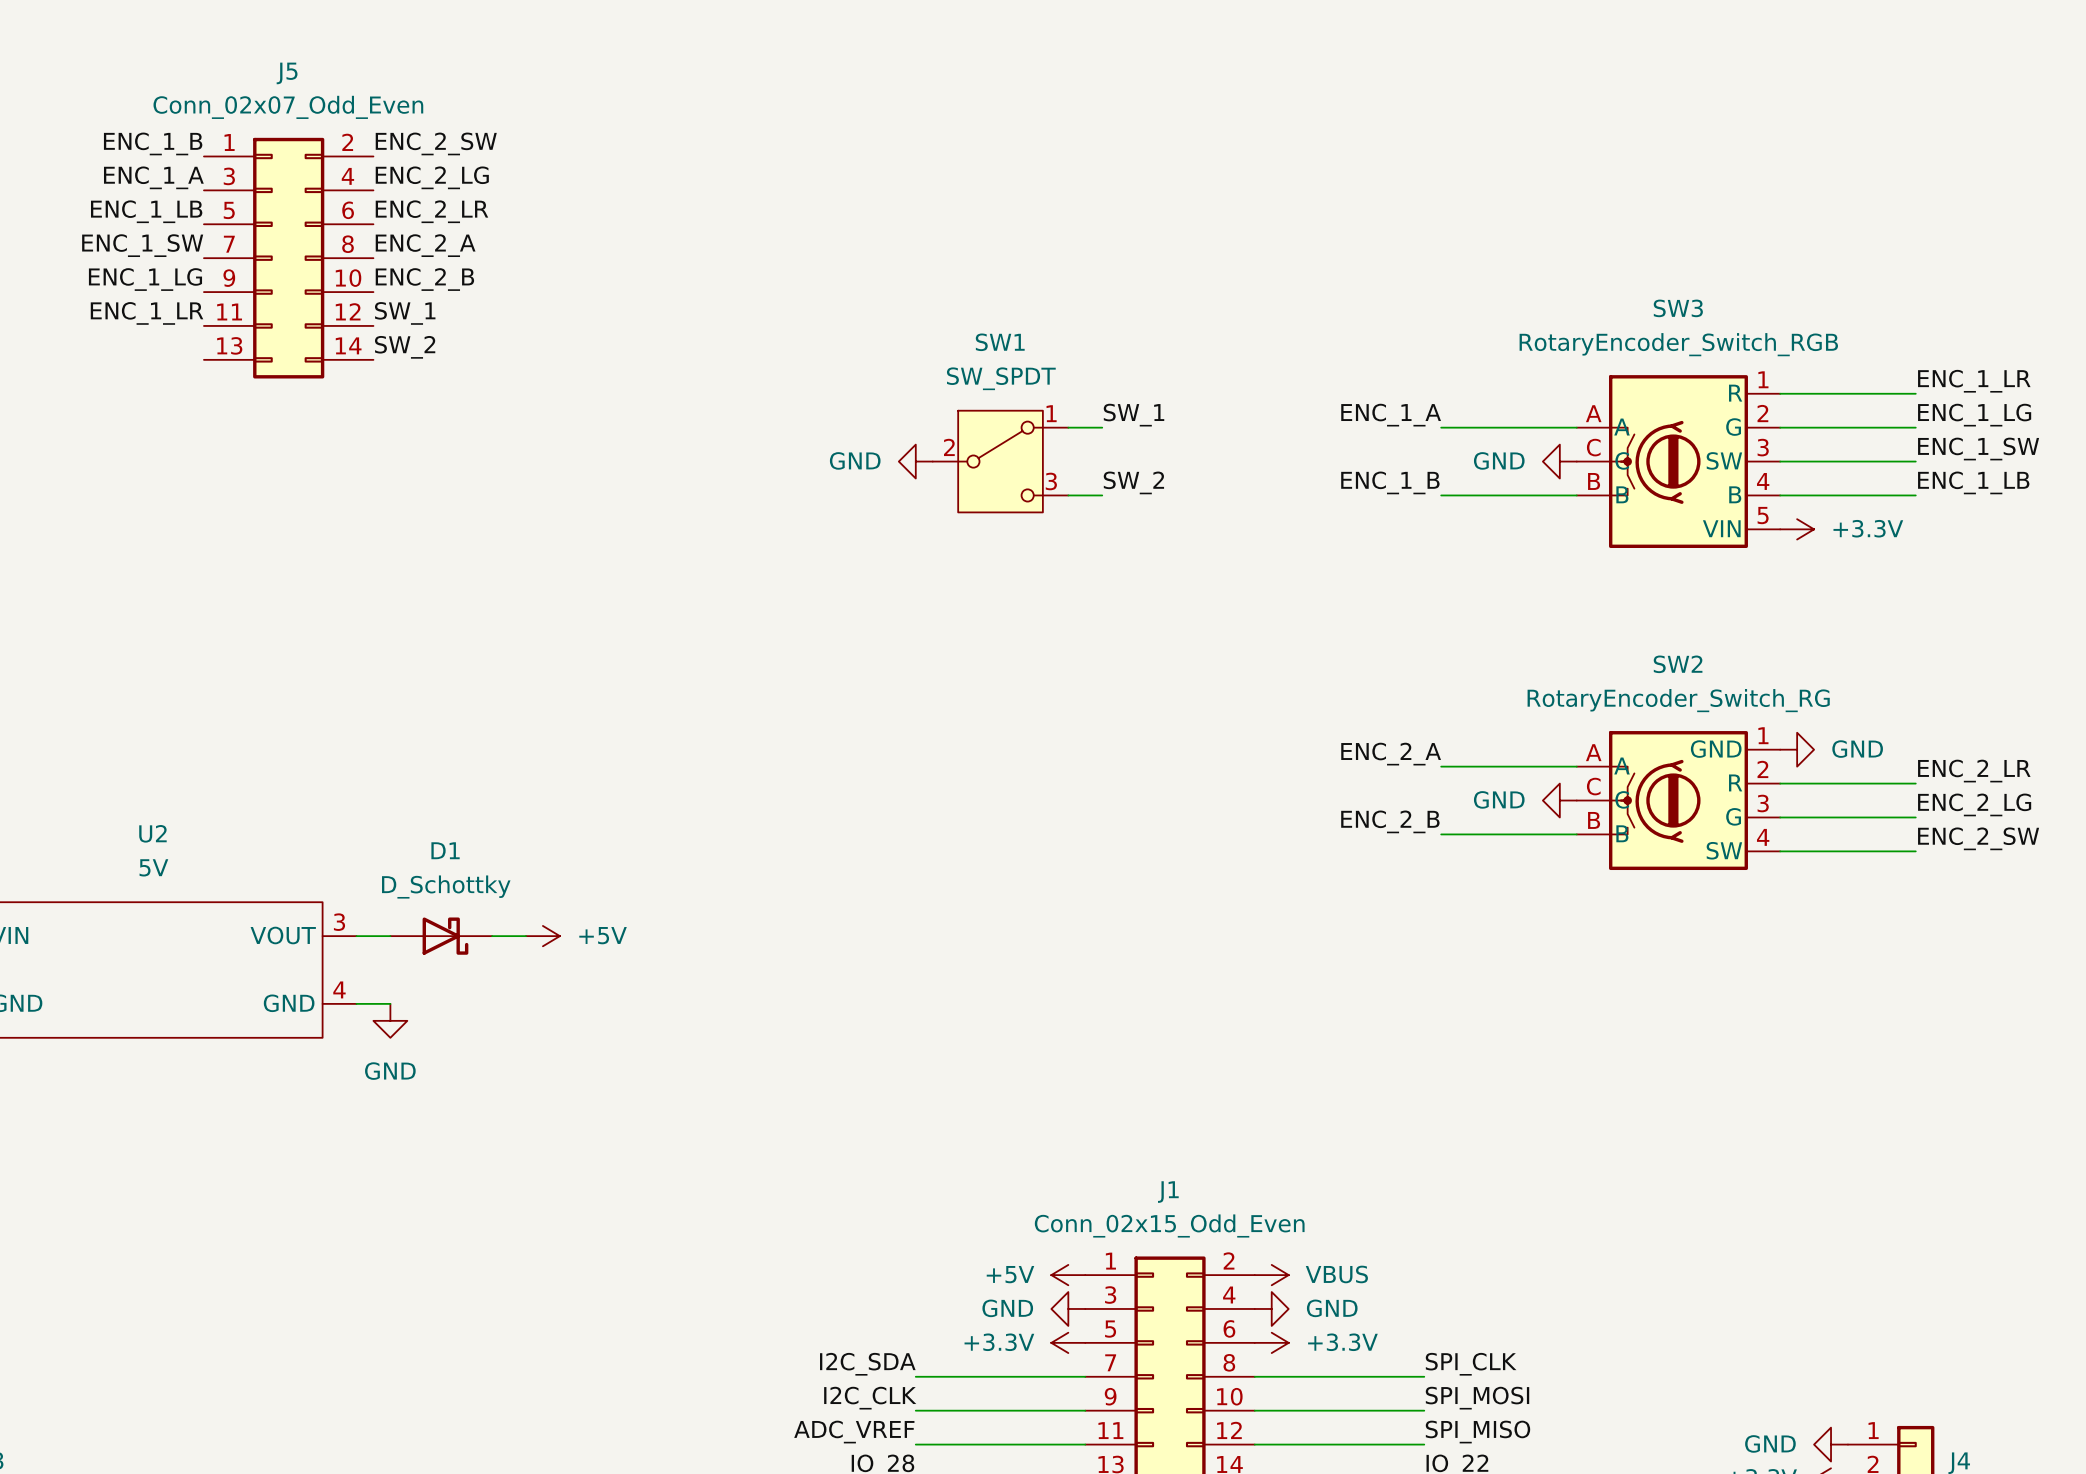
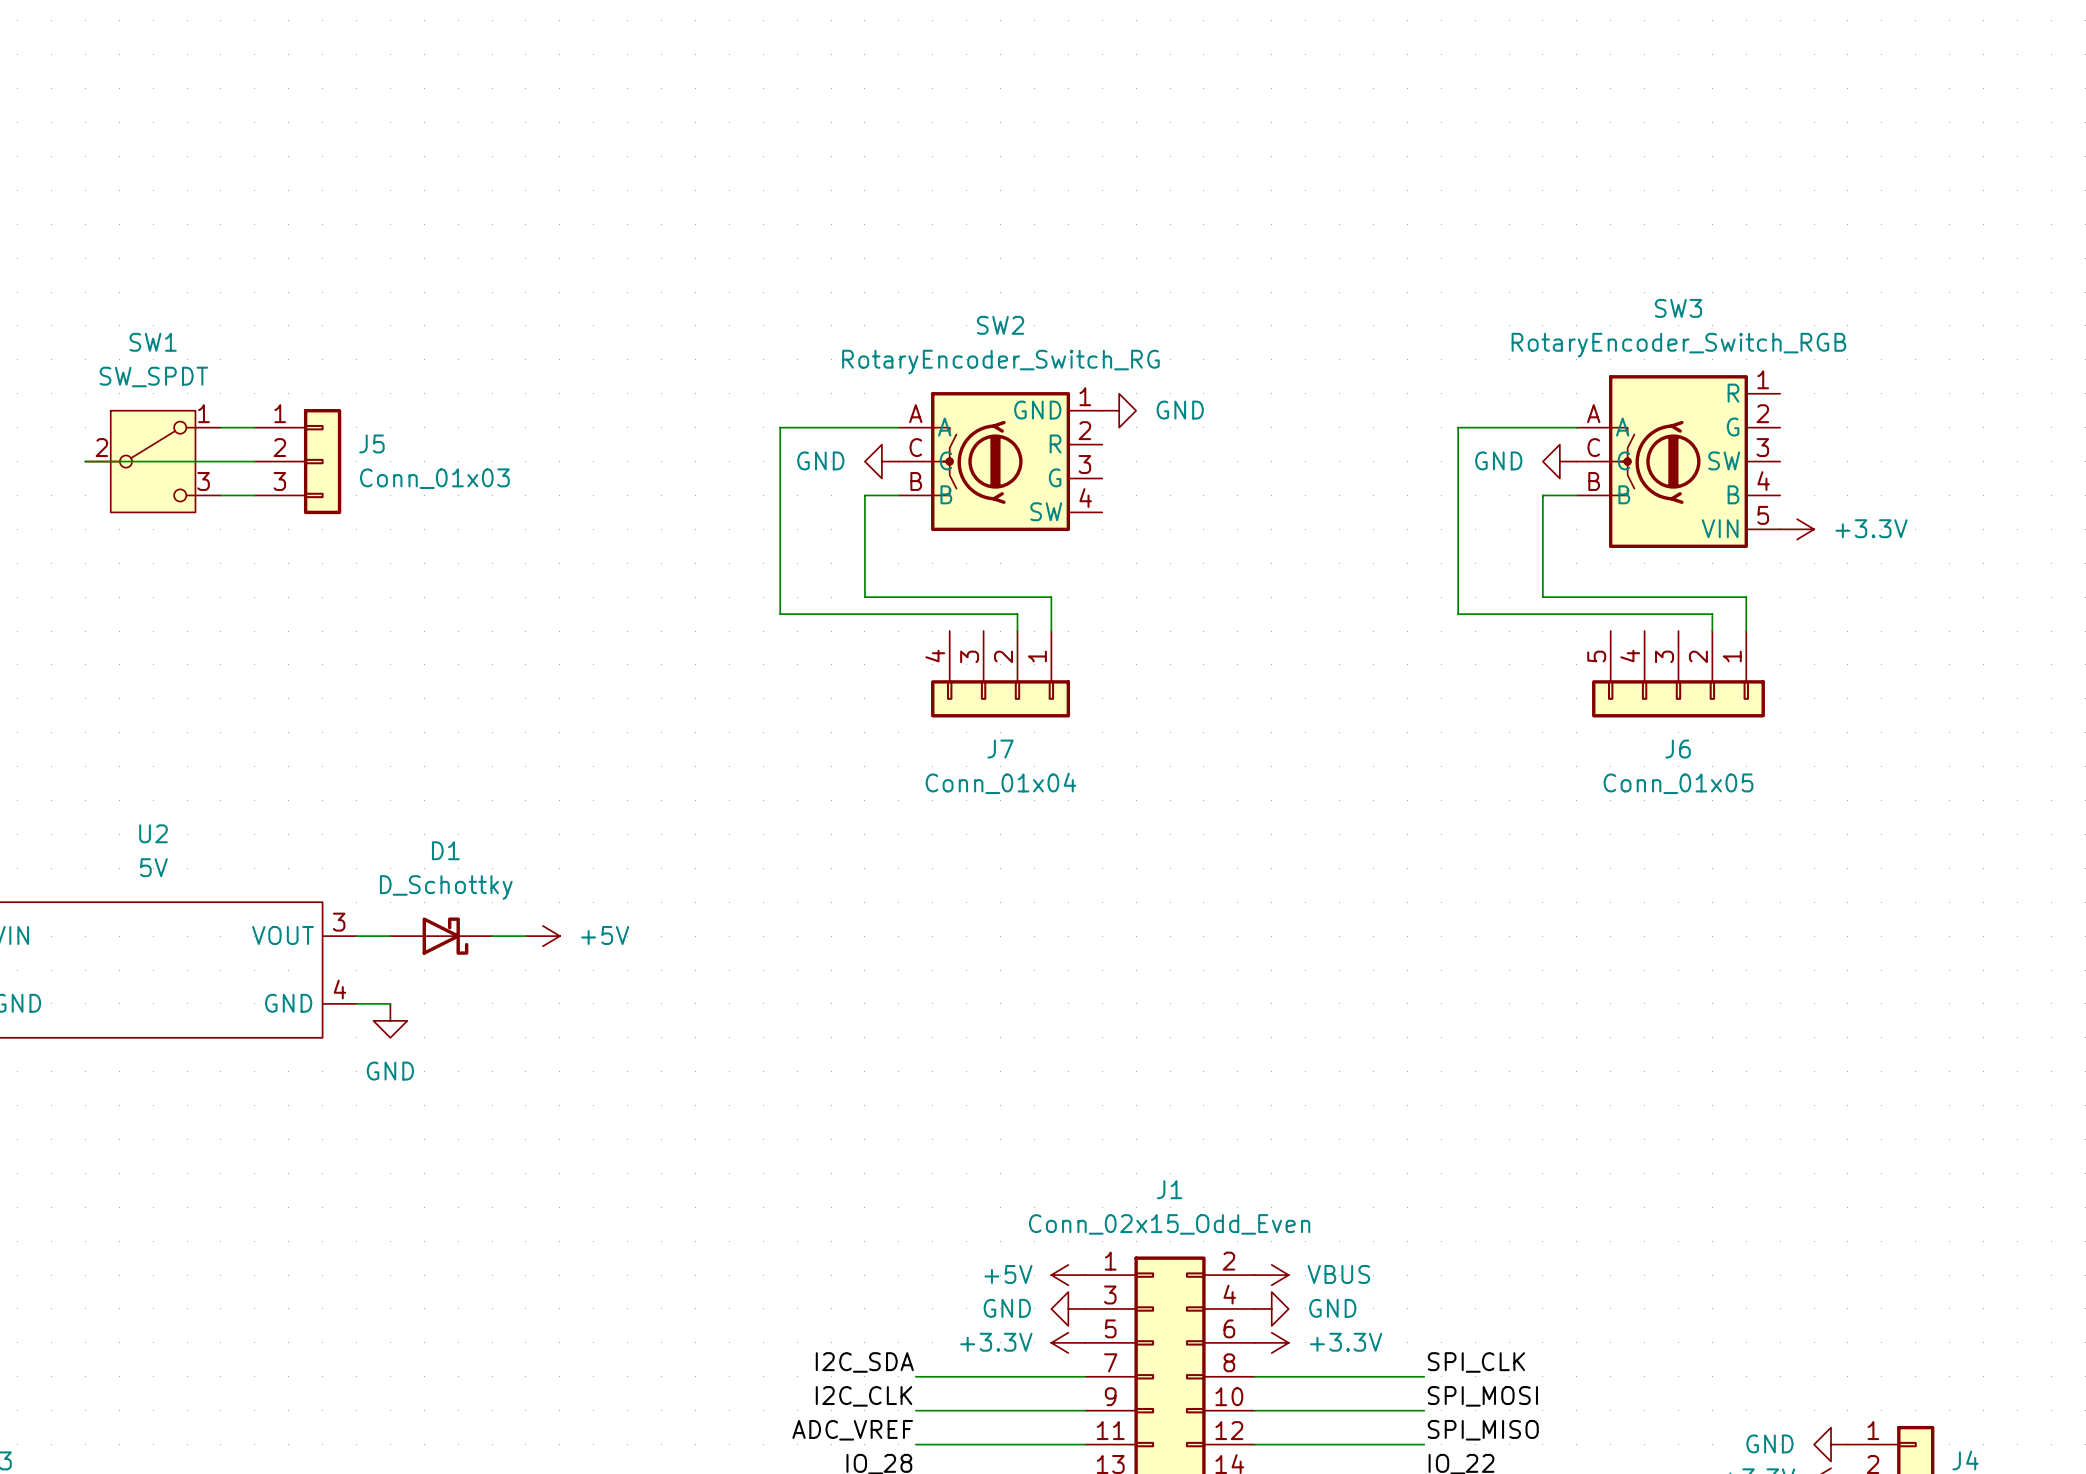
J5 name position: J5 (287, 73) -> J5 (371, 443)
J5 value: Conn_02x07_Odd_Even (288, 107) -> Conn_01x03 (434, 478)
J5 symbol: [203, 137, 374, 379] -> [254, 409, 342, 515]
label: ENC_1_B (153, 143) -> none
label: ENC_2_SW (436, 143) -> none
label: ENC_1_A (153, 177) -> none
label: ENC_2_LG (432, 177) -> none
label: ENC_1_LB (146, 211) -> none
label: ENC_2_LR (431, 211) -> none
label: ENC_1_SW (142, 245) -> none
label: ENC_2_A (425, 245) -> none
label: ENC_1_LG (145, 279) -> none
label: ENC_2_B (424, 279) -> none
label: ENC_1_LR (147, 313) -> none
label: SW_1 (405, 313) -> none
label: SW_2 (405, 347) -> none
label: ENC_1_LR (1974, 381) -> none
wire: (1780, 393) (1915, 393) -> none
power symbol: none -> GND (1119, 410)
label: SW_1 (1134, 415) -> none
label: ENC_1_A (1391, 415) -> none
label: ENC_1_LG (1974, 415) -> none
wire: none -> (220, 427) (254, 427)
wire: none -> (898, 427) (780, 427) (780, 614) (1017, 614) (1017, 631)
wire: (1068, 427) (1102, 427) -> none
wire: (1441, 427) (1458, 427) -> (1712, 631) (1712, 614) (1458, 614) (1458, 427)
wire: (1780, 427) (1915, 427) -> none
label: ENC_1_SW (1978, 449) -> none
wire: none -> (85, 461) (254, 461)
power symbol position: GND (915, 461) -> GND (881, 461)
SW1 position: (1000, 461) -> (153, 461)
wire: (1780, 461) (1915, 461) -> none
label: SW_2 (1133, 482) -> none
label: ENC_1_B (1390, 482) -> none
label: ENC_1_LB (1973, 482) -> none
wire: none -> (220, 495) (254, 495)
wire: none -> (898, 495) (864, 495) (864, 597) (1051, 597) (1051, 631)
wire: (1068, 495) (1102, 495) -> none
wire: (1441, 495) (1542, 495) -> (1746, 631) (1746, 597) (1542, 597) (1542, 495)
wire: (1780, 495) (1915, 495) -> none
J7: none -> Conn_01x04 (1000, 674)
J6: none -> Conn_01x05 (1678, 674)
power symbol: GND (1797, 749) -> none
label: ENC_2_A (1391, 754) -> none
wire: (1441, 766) (1576, 766) -> none
label: ENC_2_LR (1974, 771) -> none
wire: (1780, 783) (1915, 783) -> none
power symbol: GND (1559, 800) -> none
SW2 position: (1678, 800) -> (1000, 461)
label: ENC_2_LG (1974, 804) -> none
wire: (1780, 817) (1915, 817) -> none
label: ENC_2_B (1390, 821) -> none
wire: (1441, 834) (1576, 834) -> none
label: ENC_2_SW (1978, 838) -> none
wire: (1780, 851) (1915, 851) -> none

